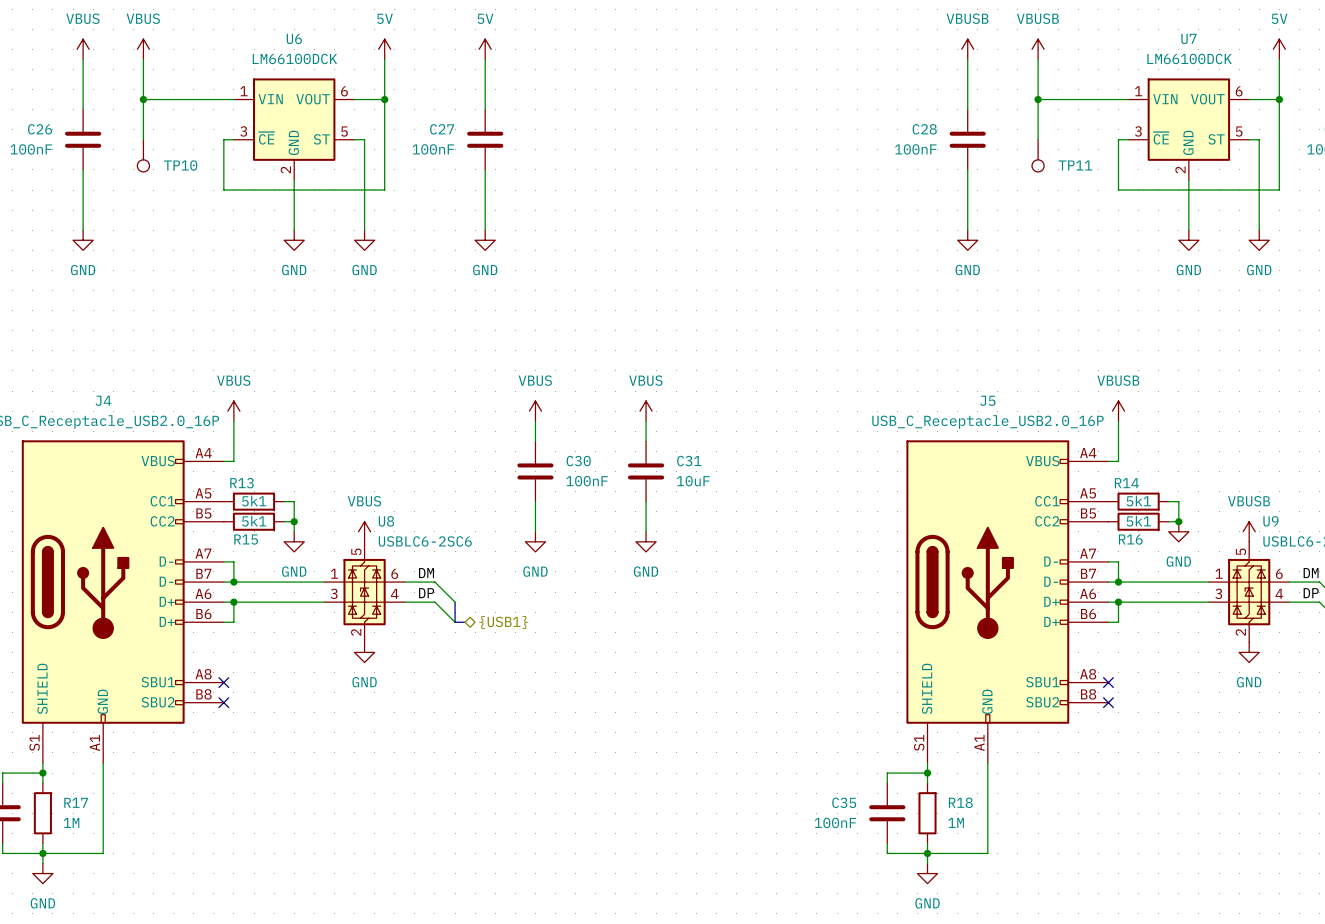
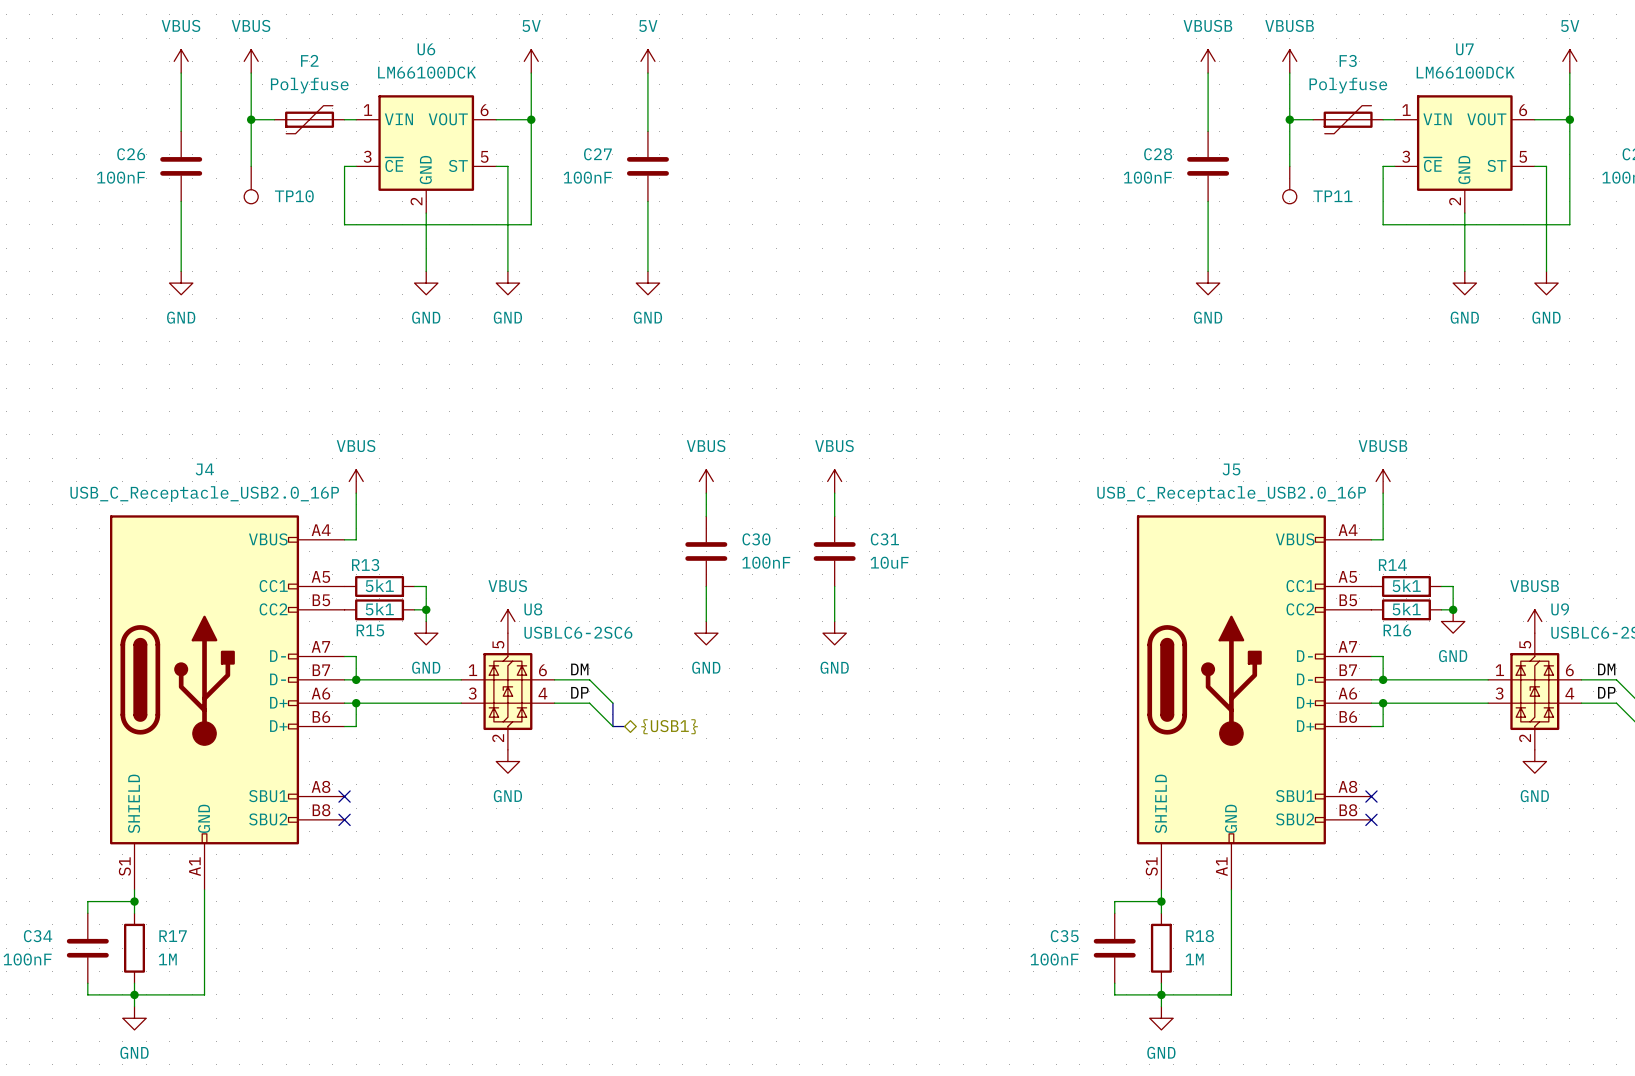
F2: none -> Polyfuse (309, 119)
F3: none -> Polyfuse (1348, 119)

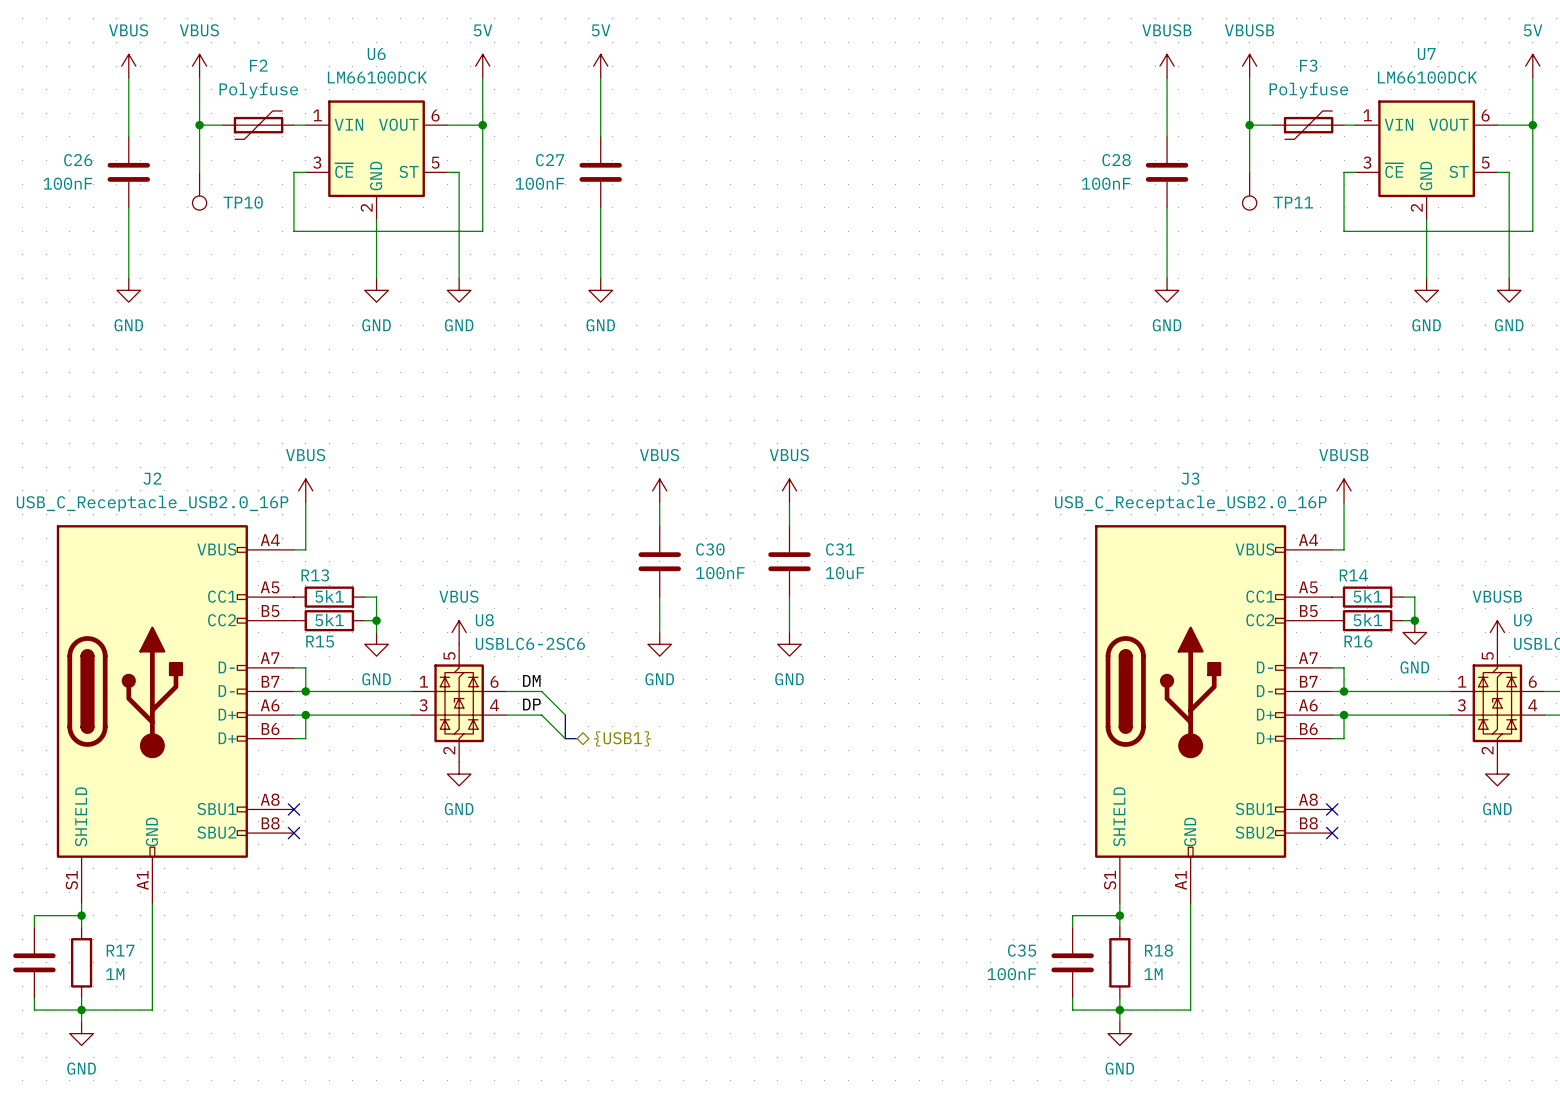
J4 name: J4 (204, 469) -> J2 (152, 478)
J5 name: J5 (1231, 469) -> J3 (1190, 478)

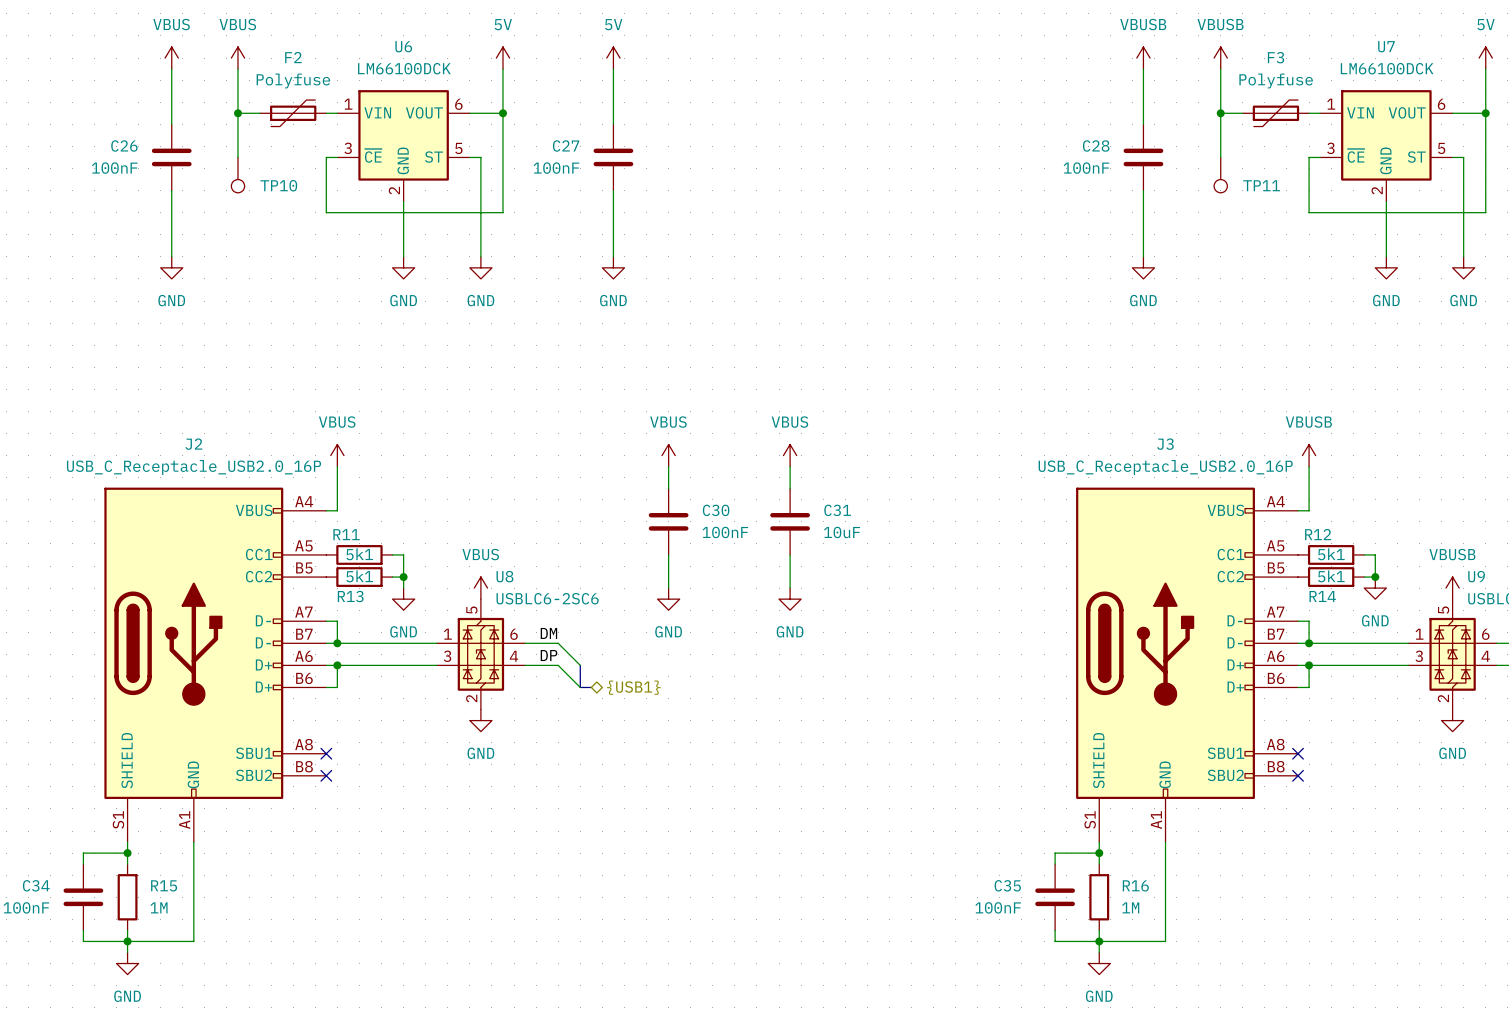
R13 name: R13 (315, 575) -> R11 (346, 534)
R14 name: R14 (1353, 575) -> R12 (1318, 534)
R15 name: R15 (320, 641) -> R13 (350, 596)
R16 name: R16 (1358, 641) -> R14 (1322, 596)
R17 name: R17 (120, 950) -> R15 (164, 885)
R18 name: R18 (1158, 950) -> R16 (1135, 885)

